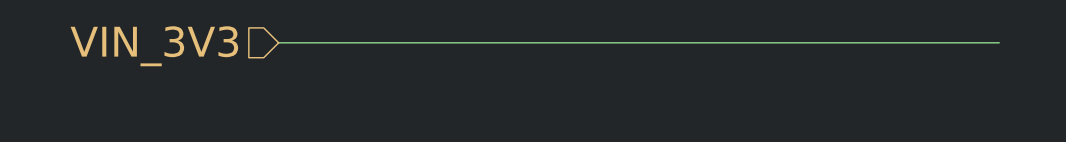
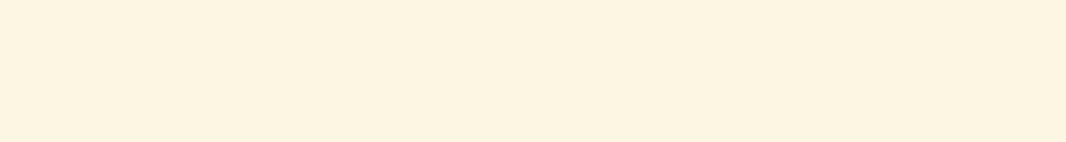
wire: (278, 42) (999, 42) -> none
hierarchical label: VIN_3V3 (154, 46) -> none

